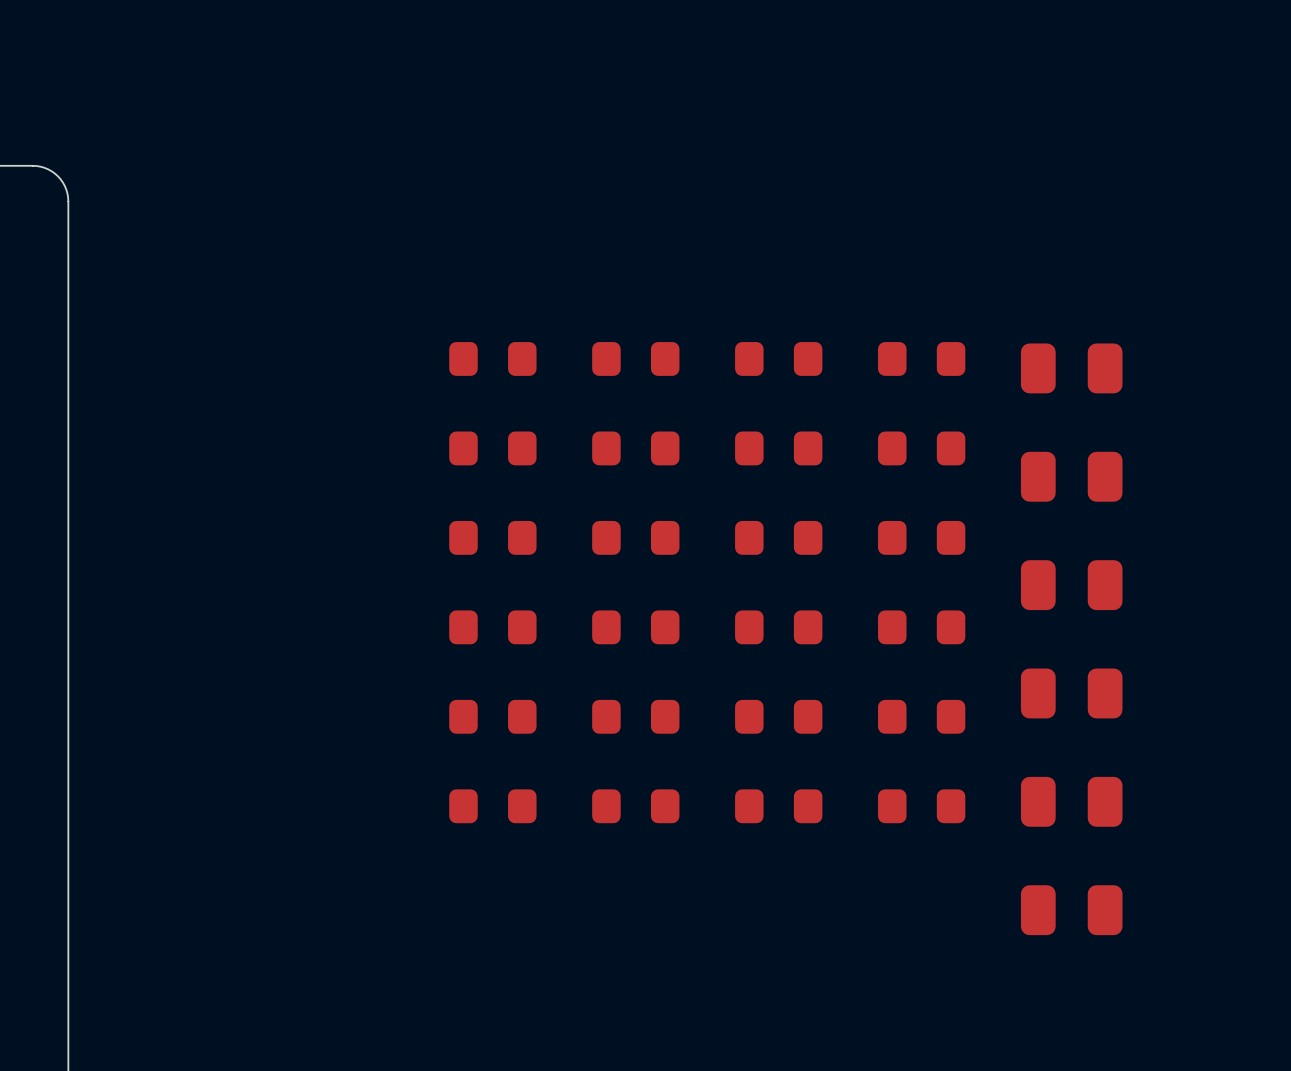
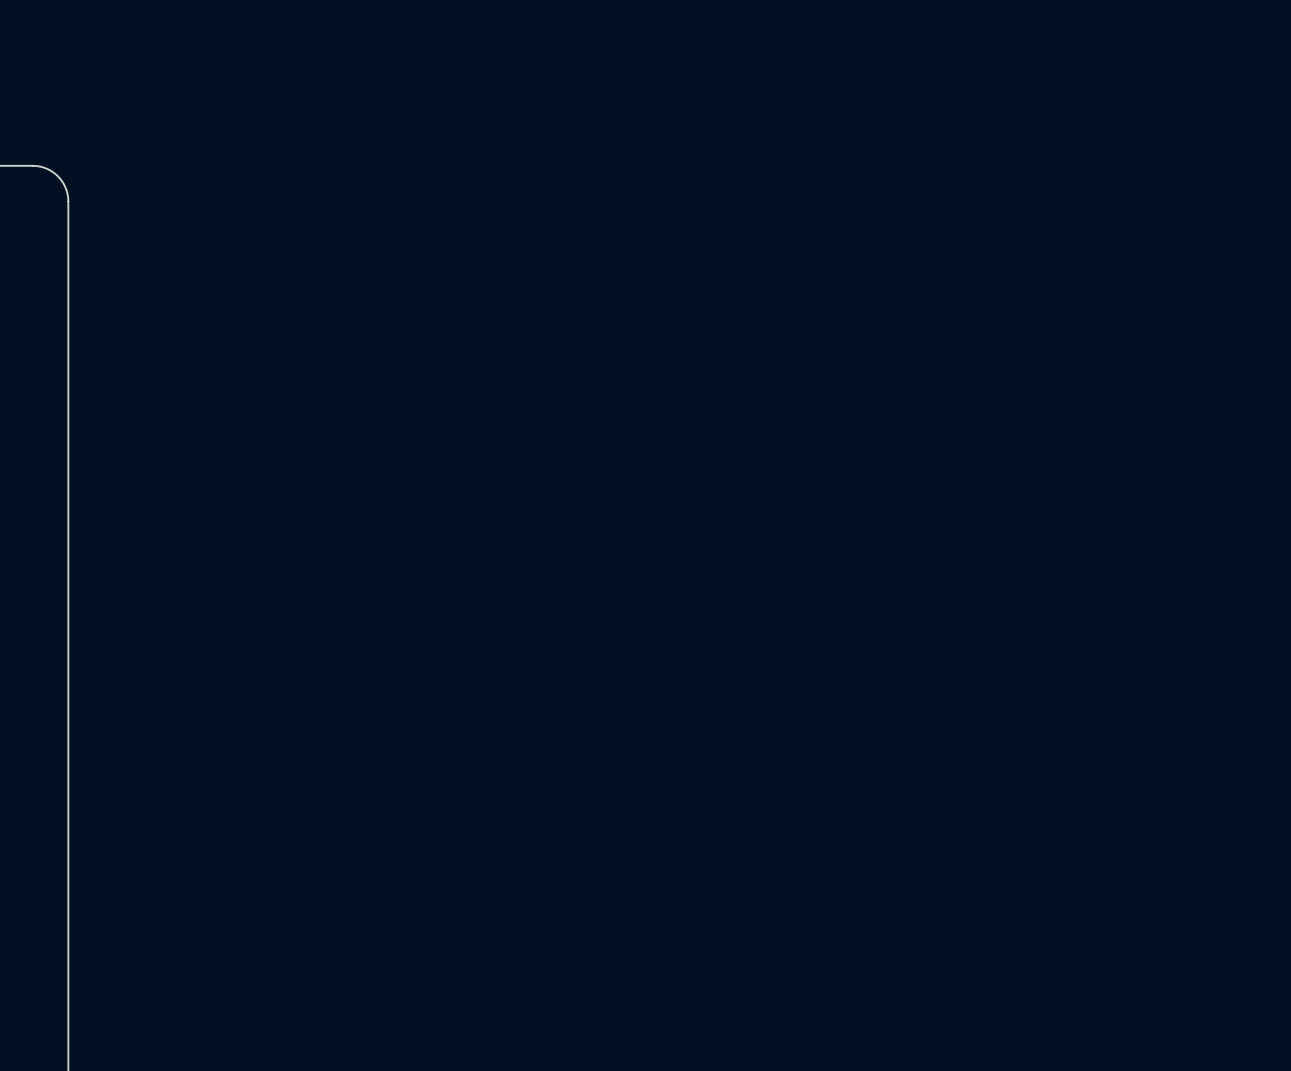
part: (492, 358) -> none
part: (635, 358) -> none
part: (778, 358) -> none
part: (921, 358) -> none
part: (1071, 368) -> none
part: (492, 448) -> none
part: (635, 448) -> none
part: (778, 448) -> none
part: (921, 448) -> none
part: (1071, 476) -> none
part: (492, 537) -> none
part: (635, 537) -> none
part: (778, 537) -> none
part: (921, 537) -> none
part: (1071, 585) -> none
part: (492, 627) -> none
part: (635, 627) -> none
part: (778, 627) -> none
part: (921, 627) -> none
part: (1071, 693) -> none
part: (492, 716) -> none
part: (635, 716) -> none
part: (778, 716) -> none
part: (921, 716) -> none
part: (1071, 801) -> none
part: (492, 806) -> none
part: (635, 806) -> none
part: (778, 806) -> none
part: (921, 806) -> none
part: (1071, 910) -> none

